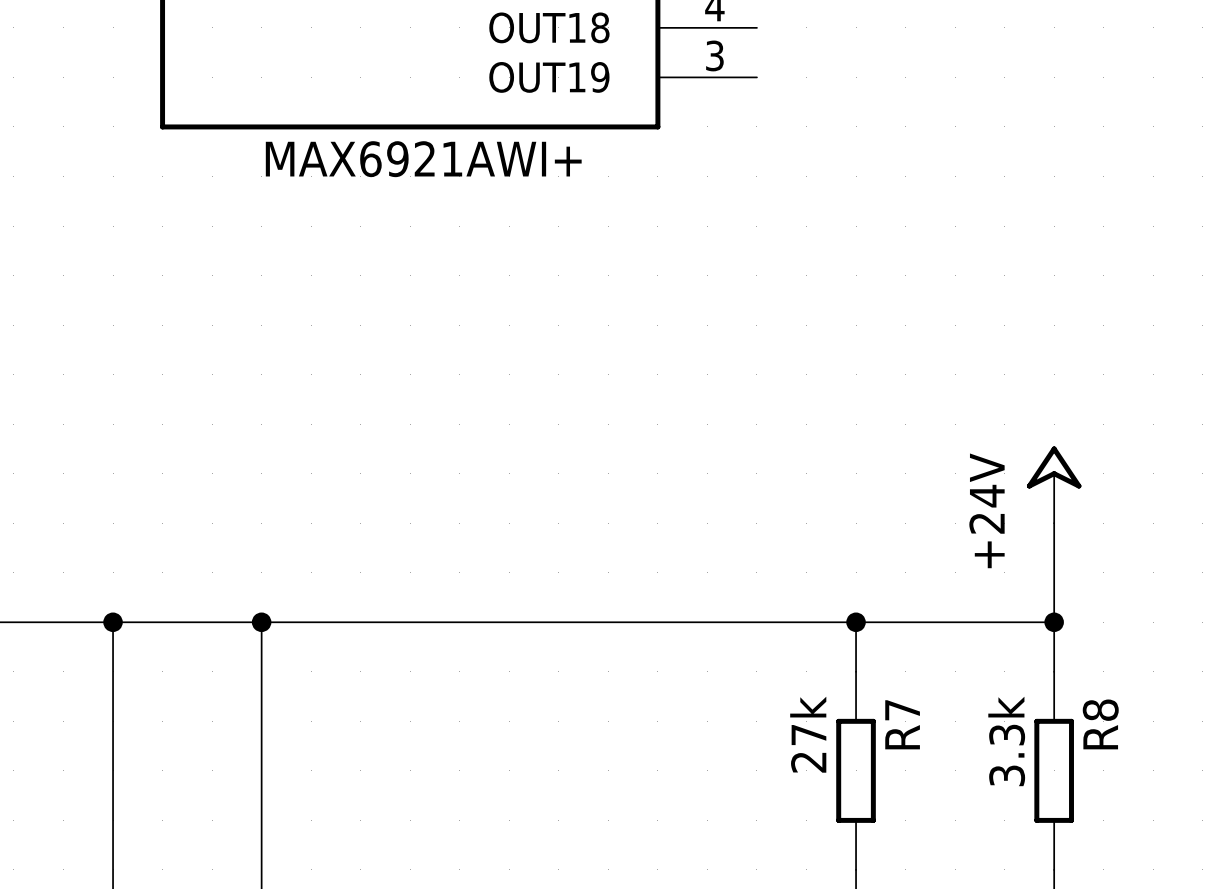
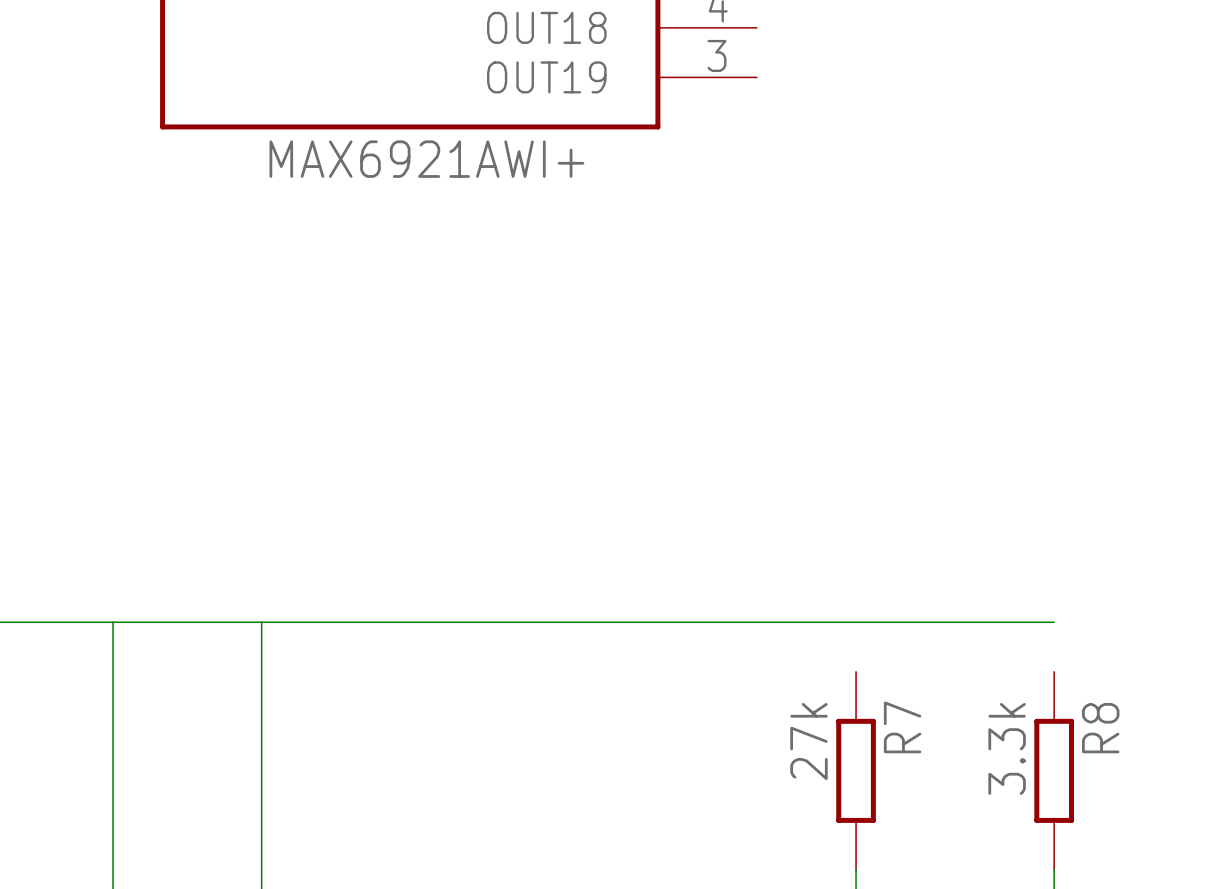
power symbol: +24V (1054, 484) -> none
wire: (1054, 523) (1054, 671) -> none
junction: (113, 622) -> none
junction: (261, 622) -> none
wire: (856, 622) (856, 671) -> none
junction: (856, 622) -> none
junction: (1054, 622) -> none

